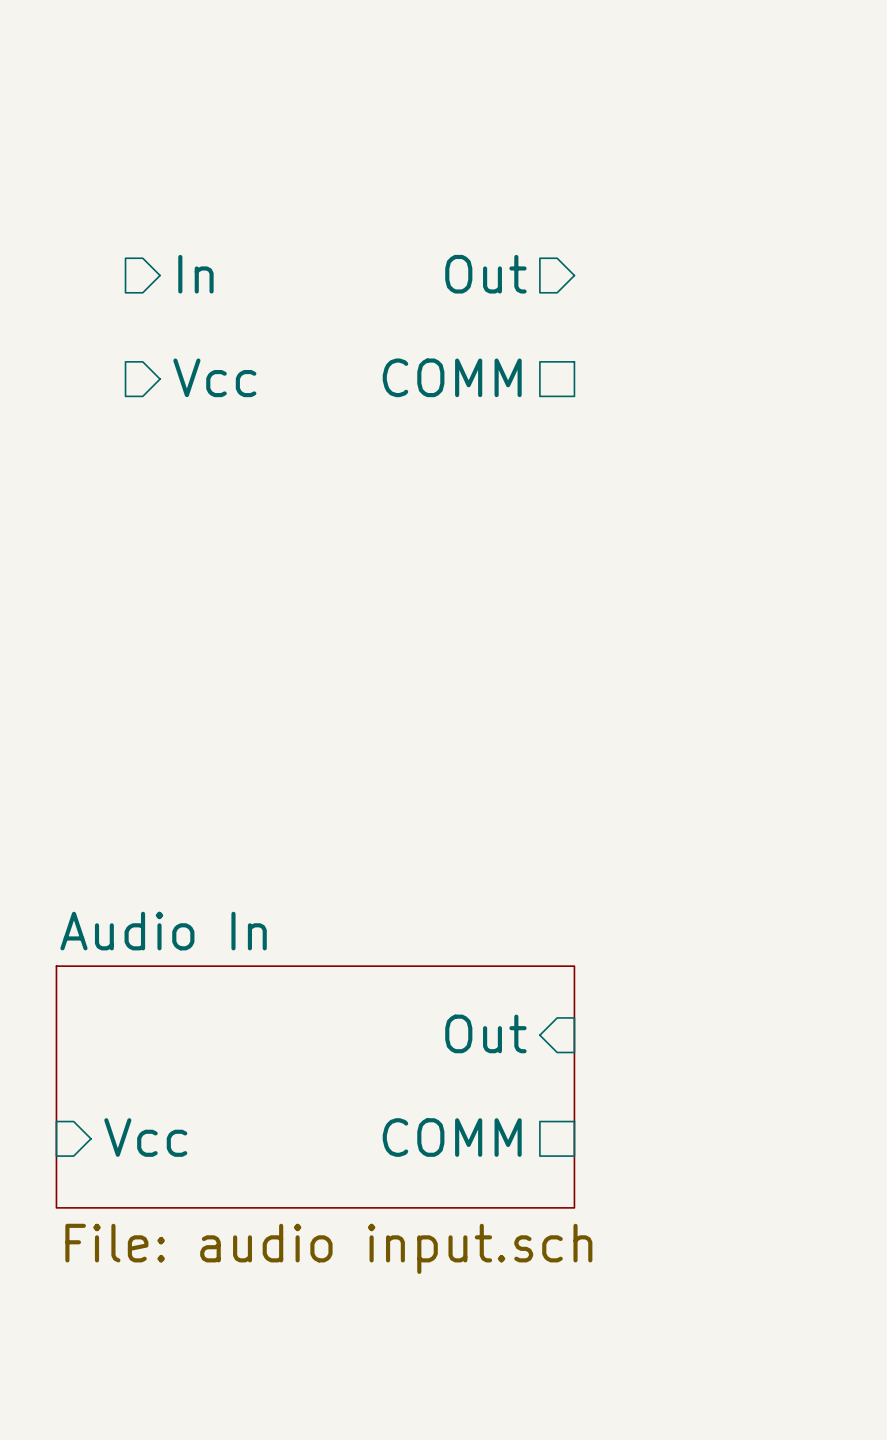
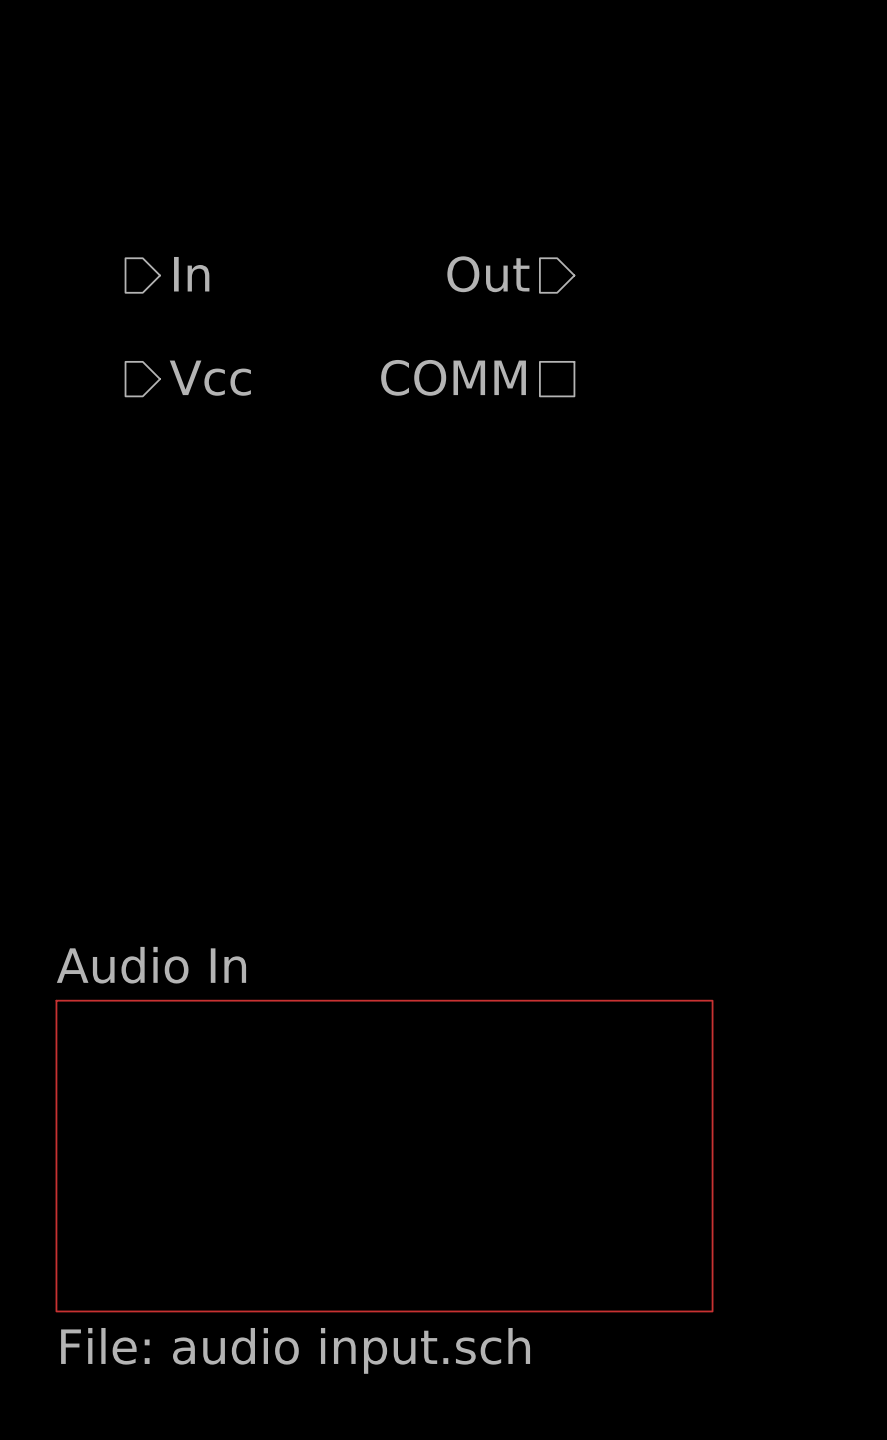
sheet pin: Out (485, 1033) -> none
sheet Audio In: File: audio input.sch (315, 1087) -> none
sheet pin: Vcc (145, 1137) -> none
sheet pin: COMM (452, 1137) -> none
sheet Audio In: none -> File: audio input.sch (384, 1156)

